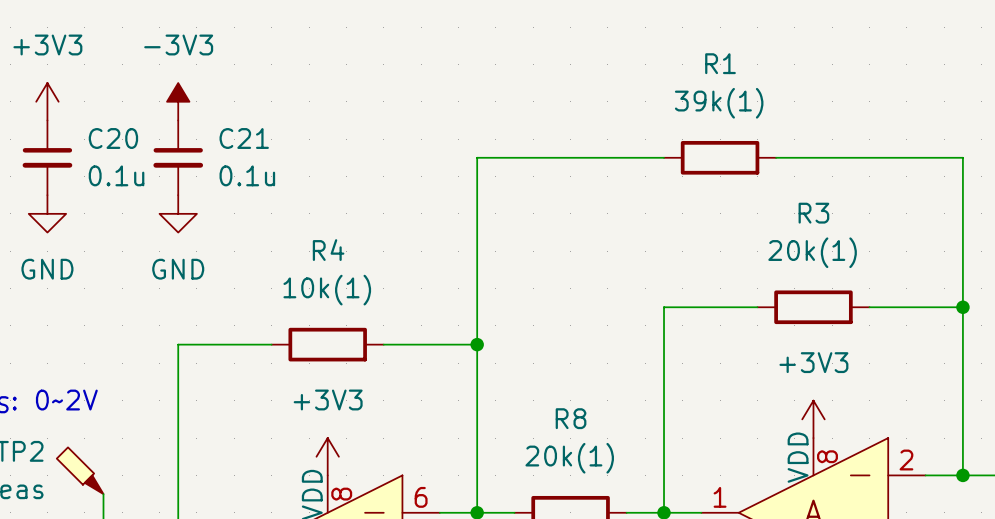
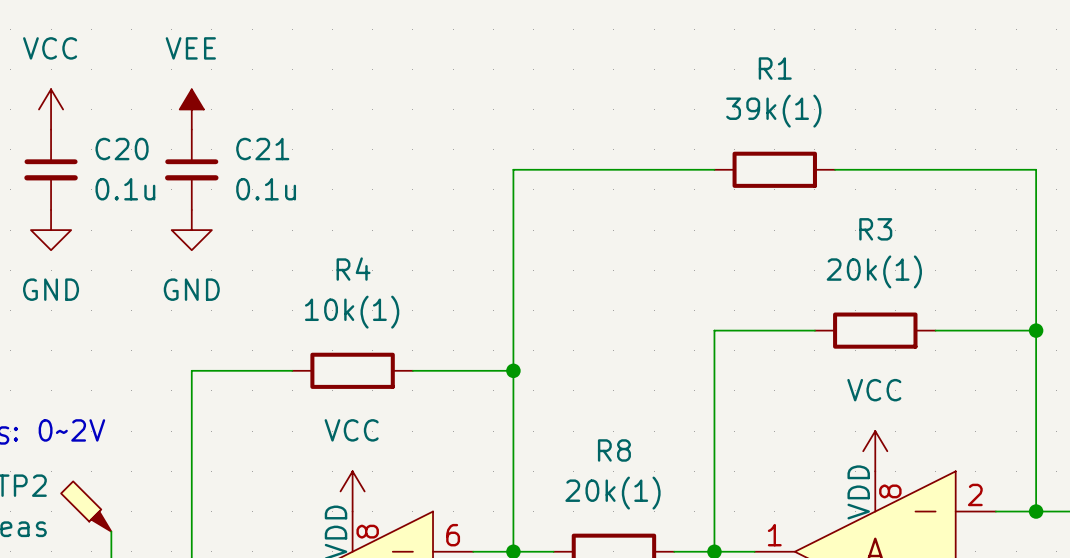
power symbol: +3V3 (47, 101) -> VCC (51, 109)
power symbol: -3V3 (178, 101) -> VEE (191, 109)
power symbol: +3V3 (813, 419) -> VCC (875, 451)
power symbol: +3V3 (327, 456) -> VCC (352, 491)

